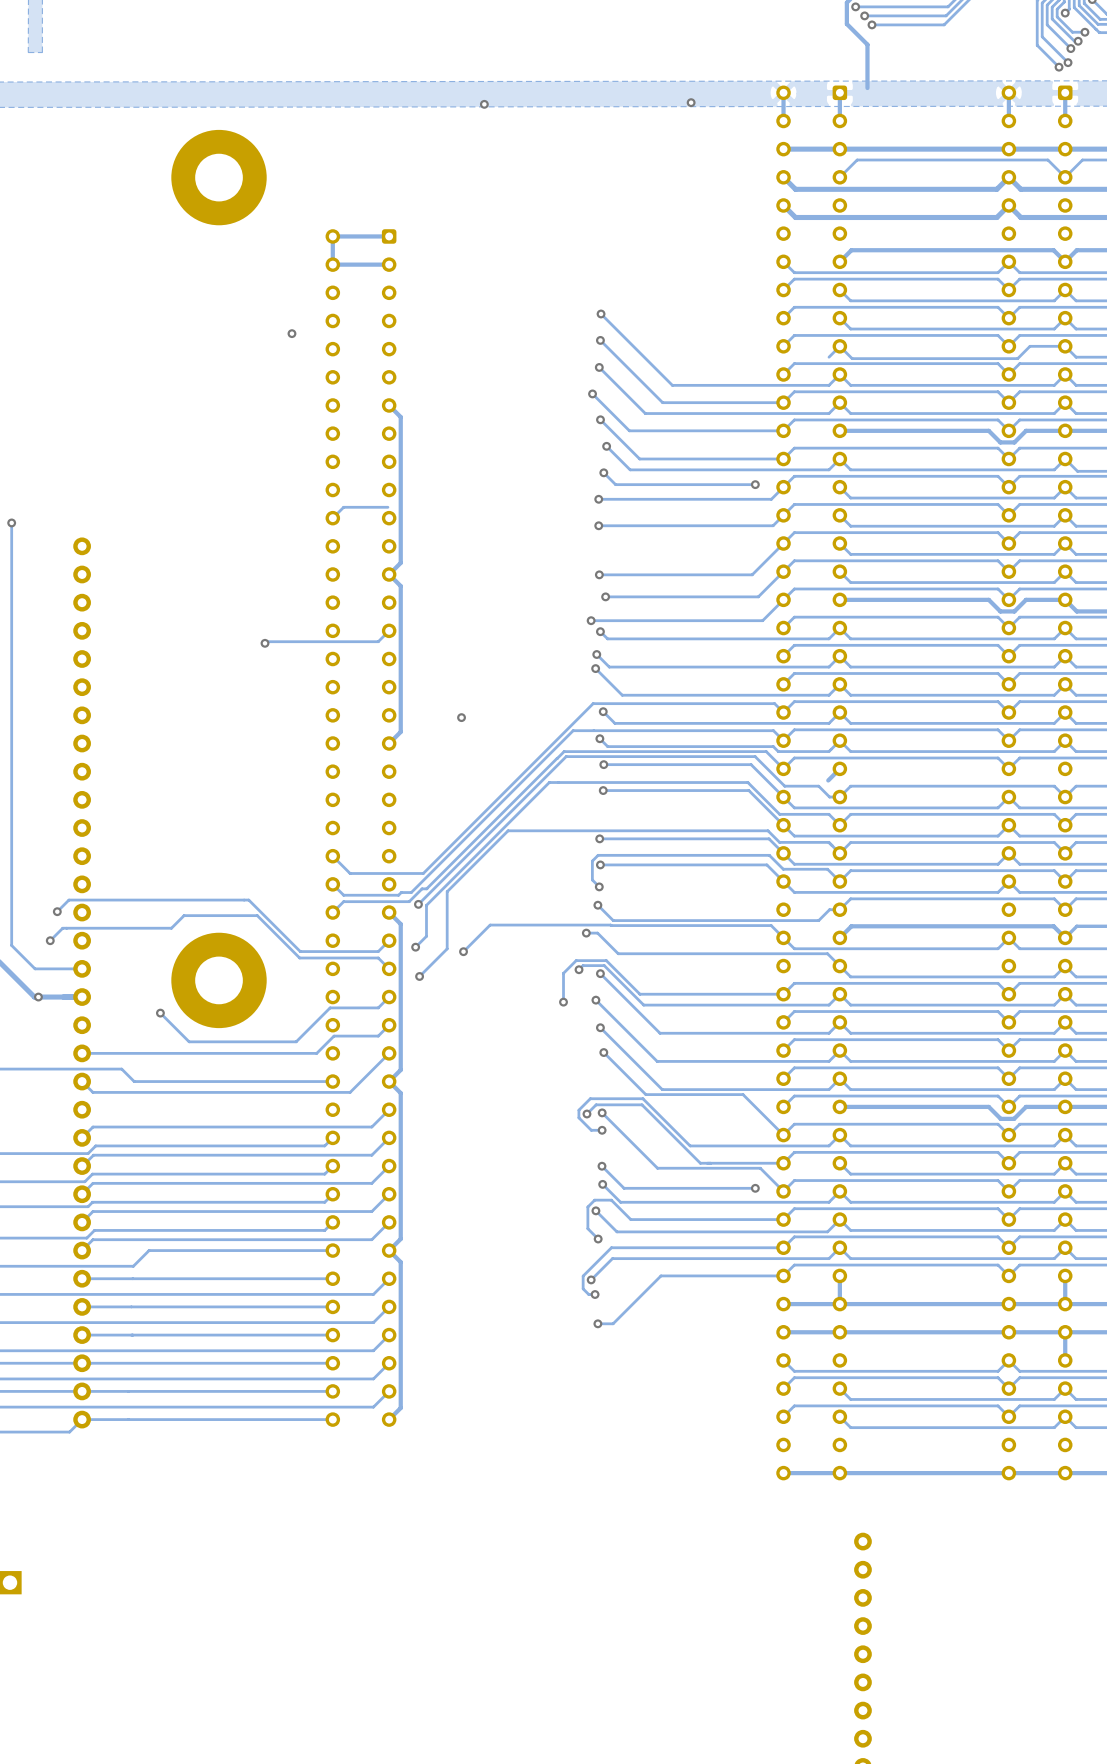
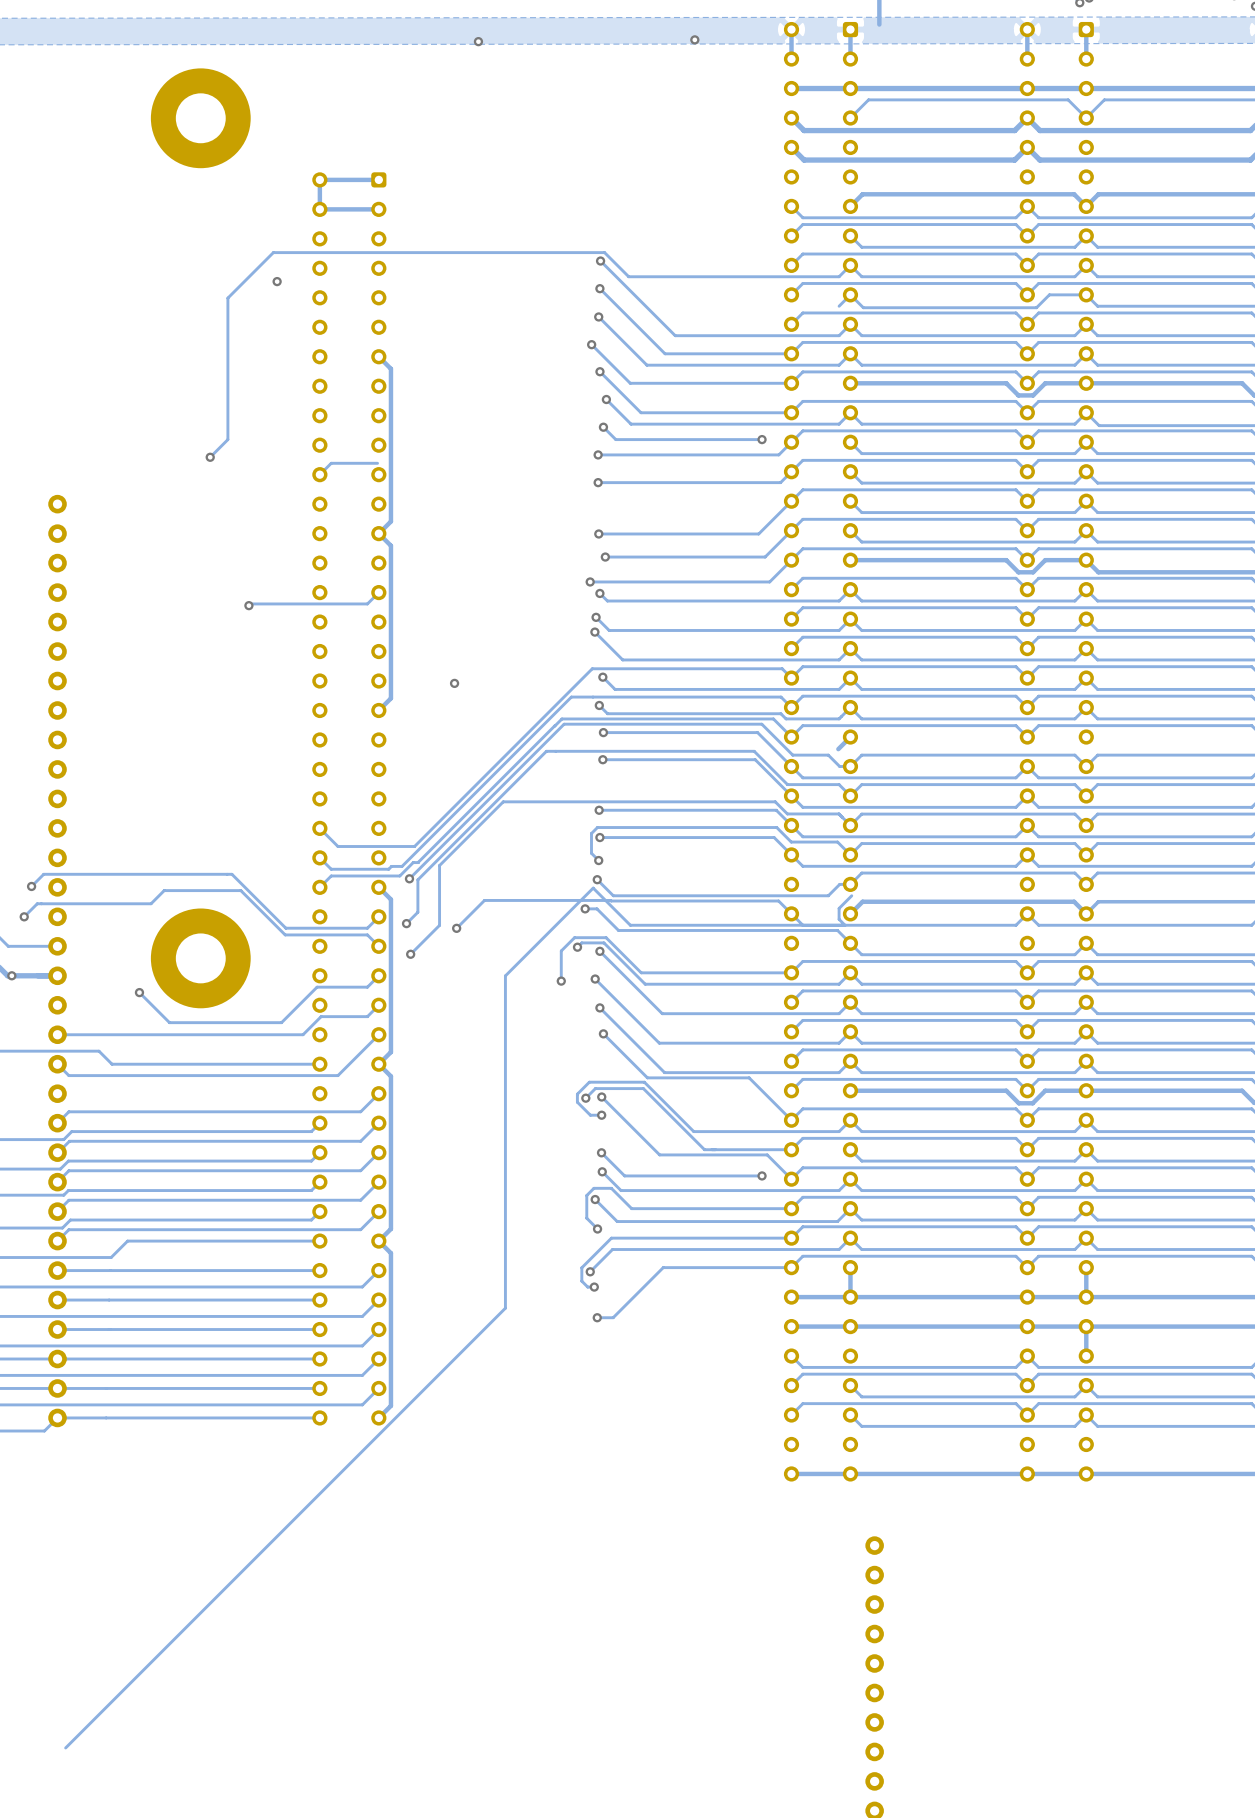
track: none -> (850, 265) (839, 276) (628, 276) (604, 252) (273, 252) (227, 298) (227, 439) (210, 457)
via: none -> (210, 457)
track: none -> (851, 895) (839, 908) (839, 919) (845, 925)
track: none -> (802, 925) (630, 925) (593, 888) (505, 975) (505, 1308) (65, 1747)

